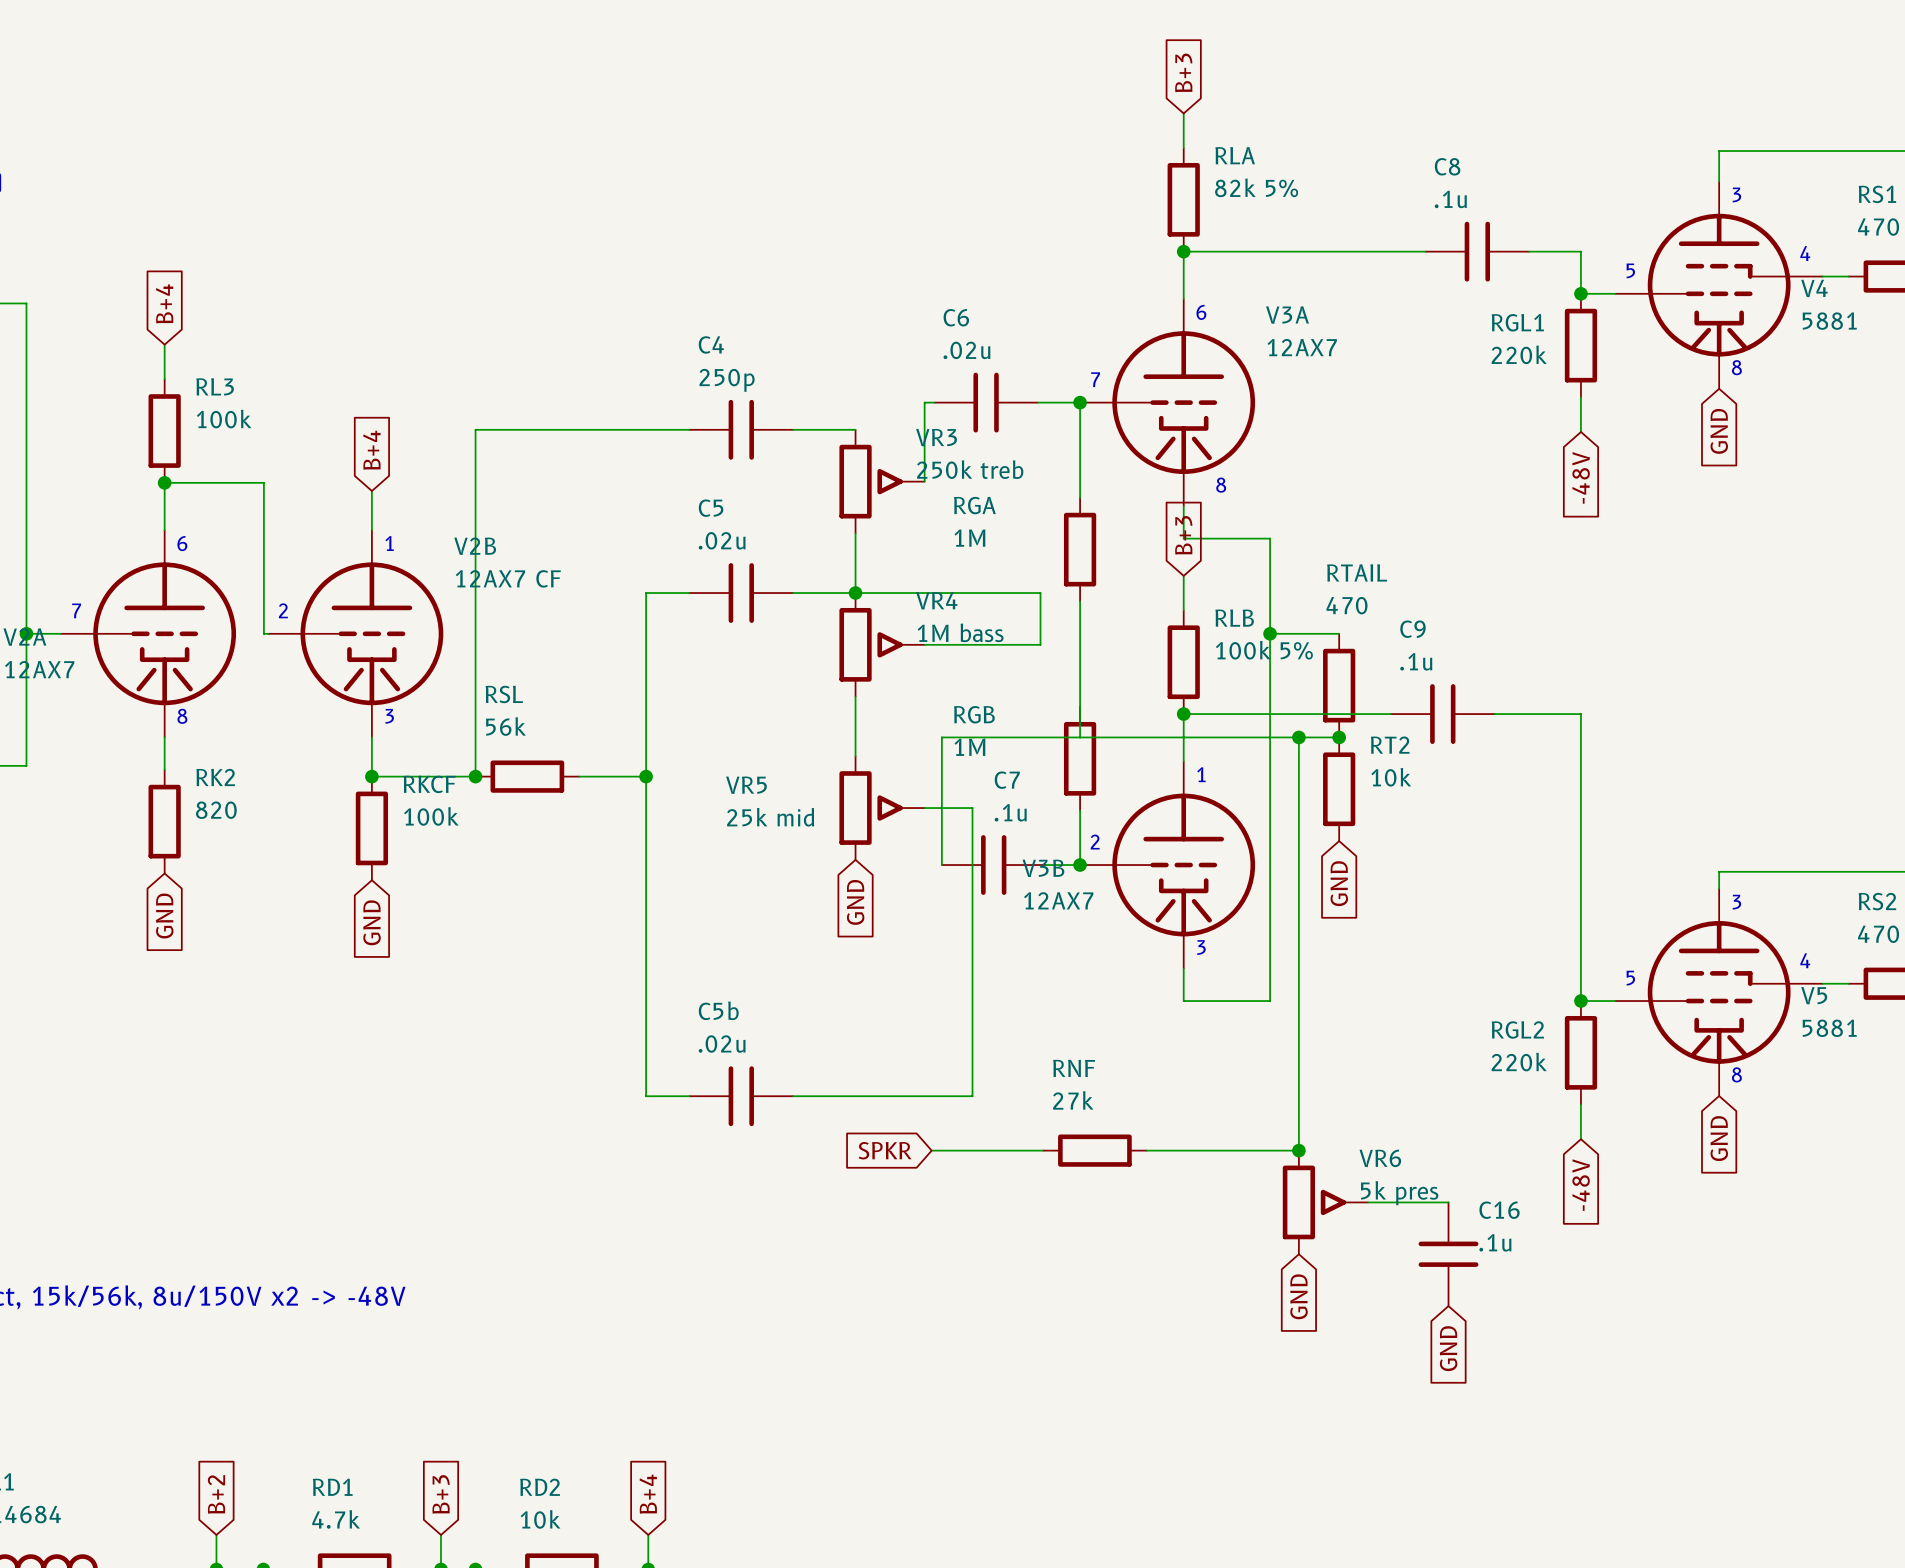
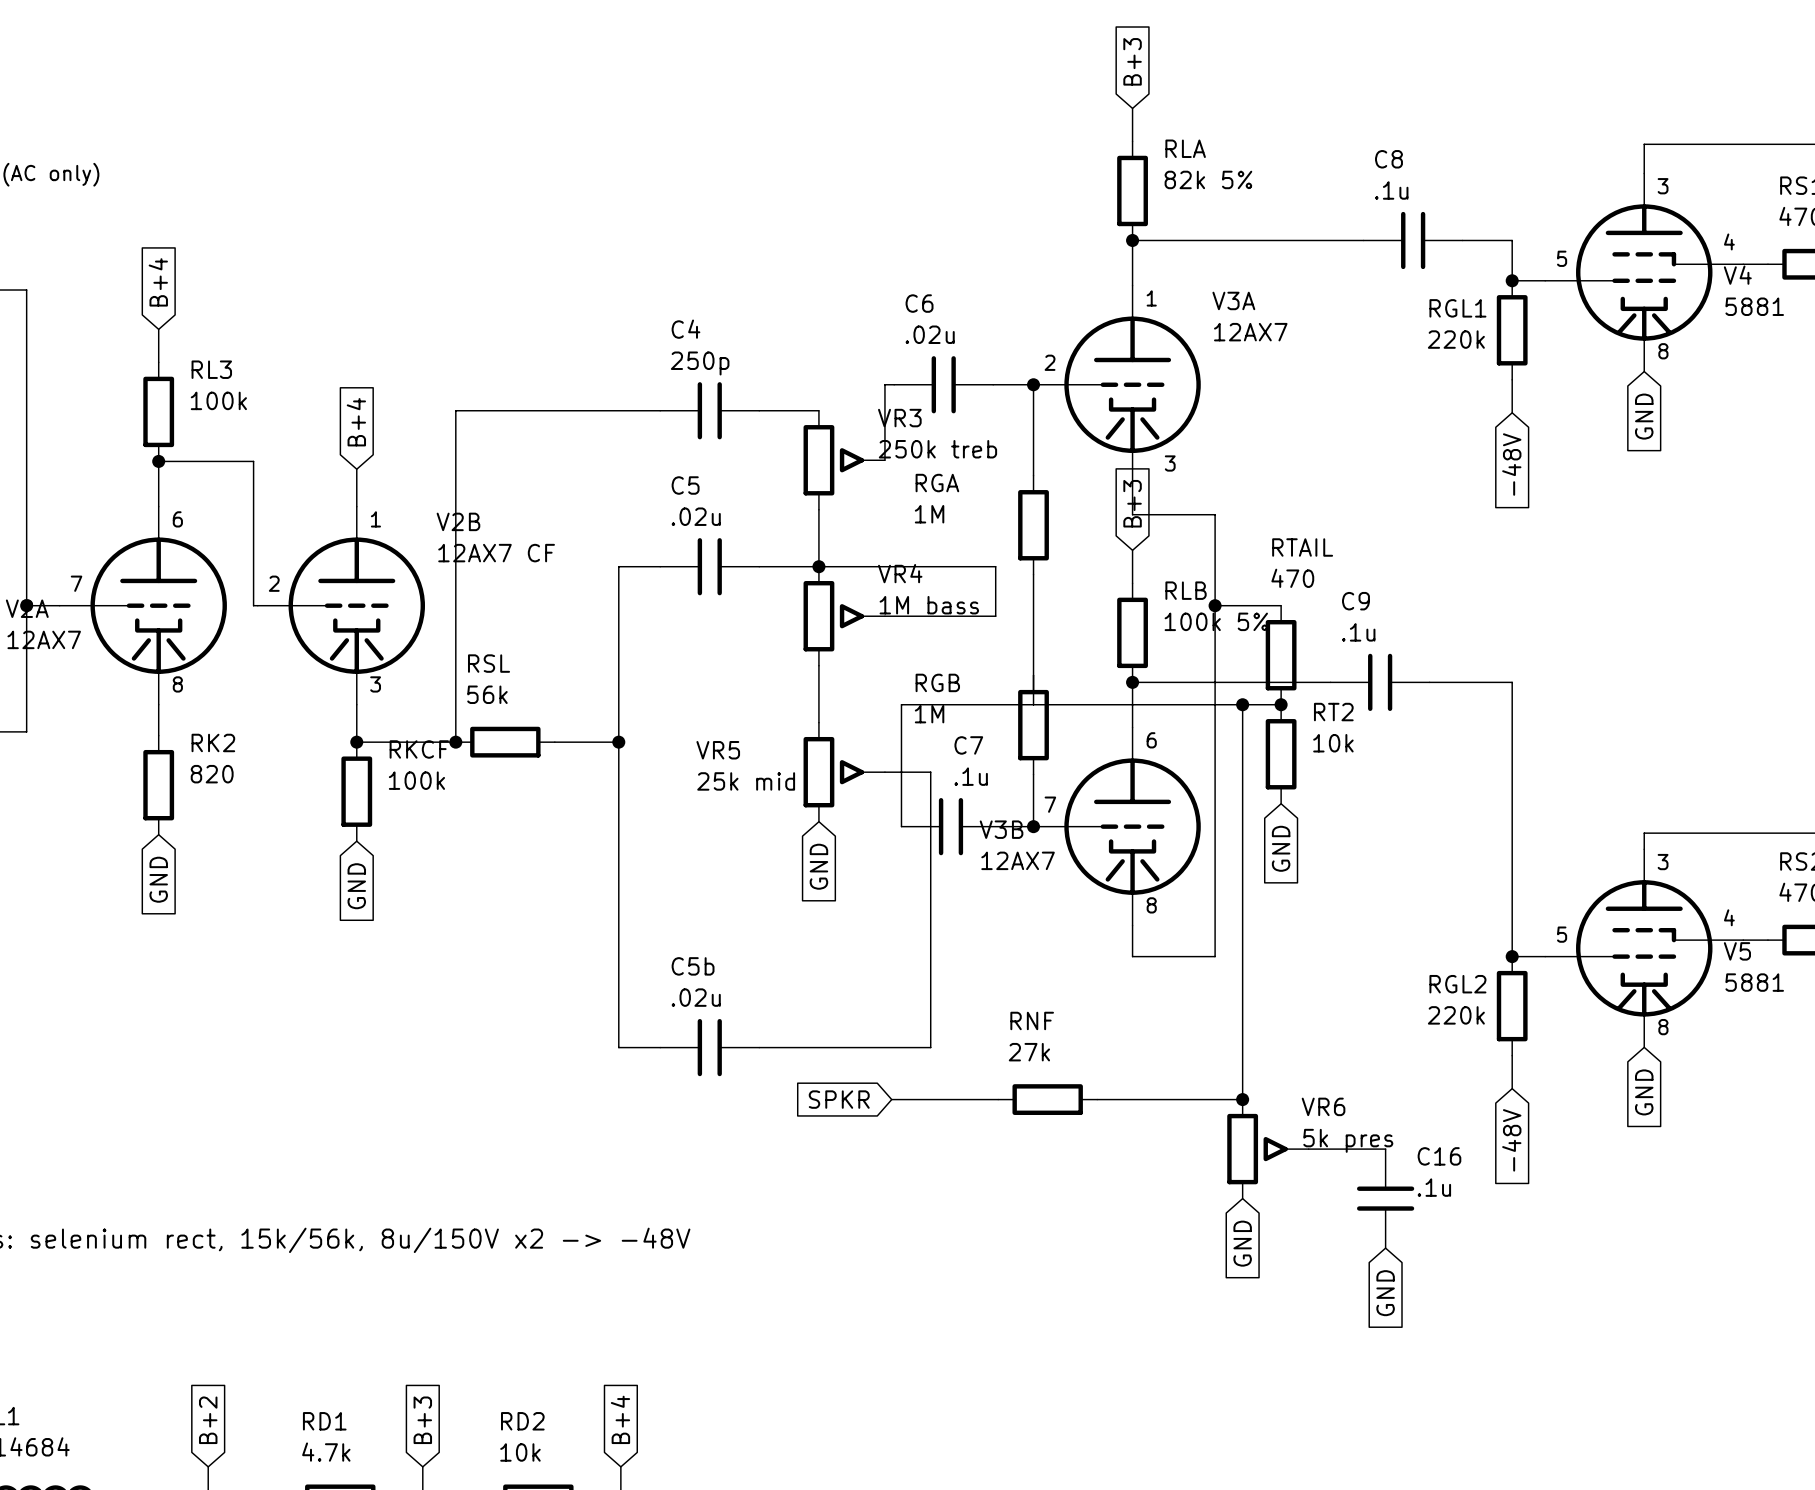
text: 6 (1201, 312) -> 1 (1151, 298)
text: 7 (1095, 379) -> 2 (1050, 362)
text: 8 (1221, 485) -> 3 (1170, 463)
text: 1 (1201, 774) -> 6 (1151, 740)
text: 2 (1095, 842) -> 7 (1050, 804)
text: 3 (1201, 947) -> 8 (1151, 905)

